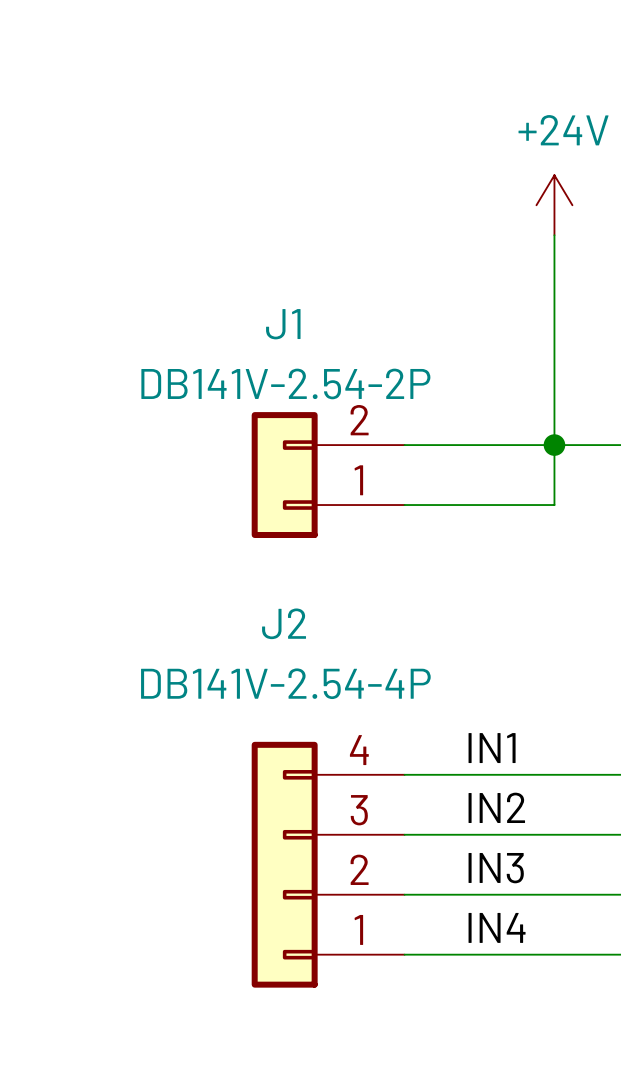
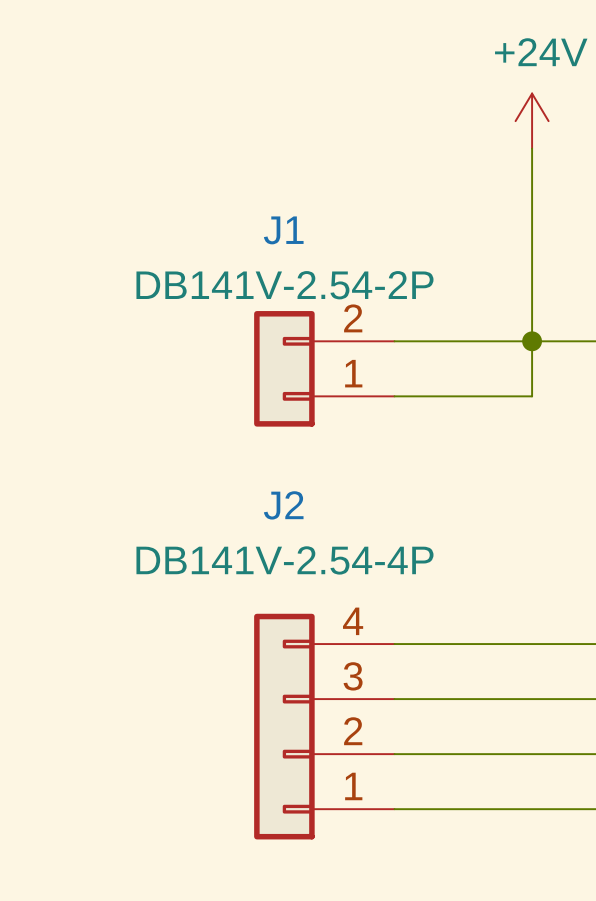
label: IN1 (492, 748) -> none
label: IN2 (496, 807) -> none
label: IN3 (496, 868) -> none
label: IN4 (497, 927) -> none

